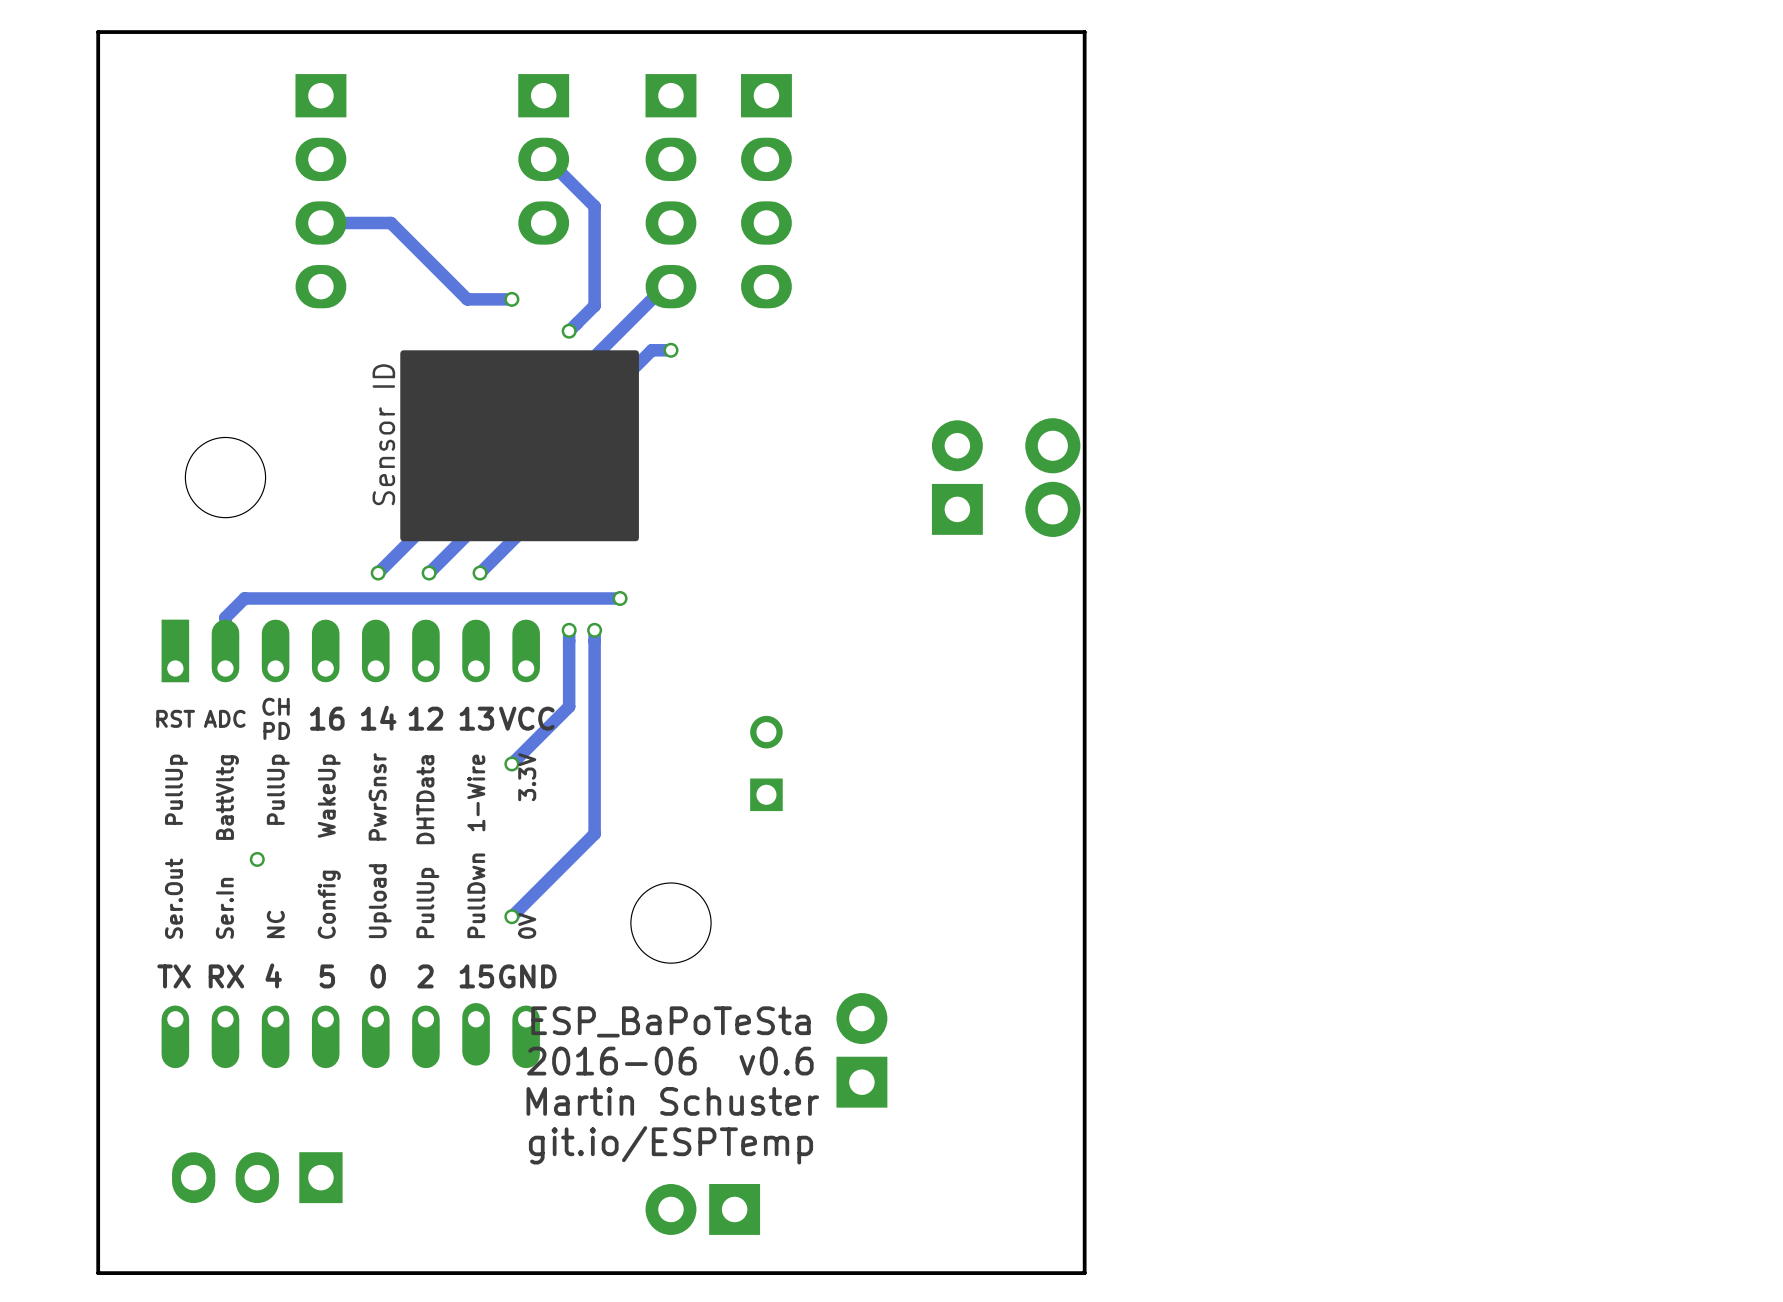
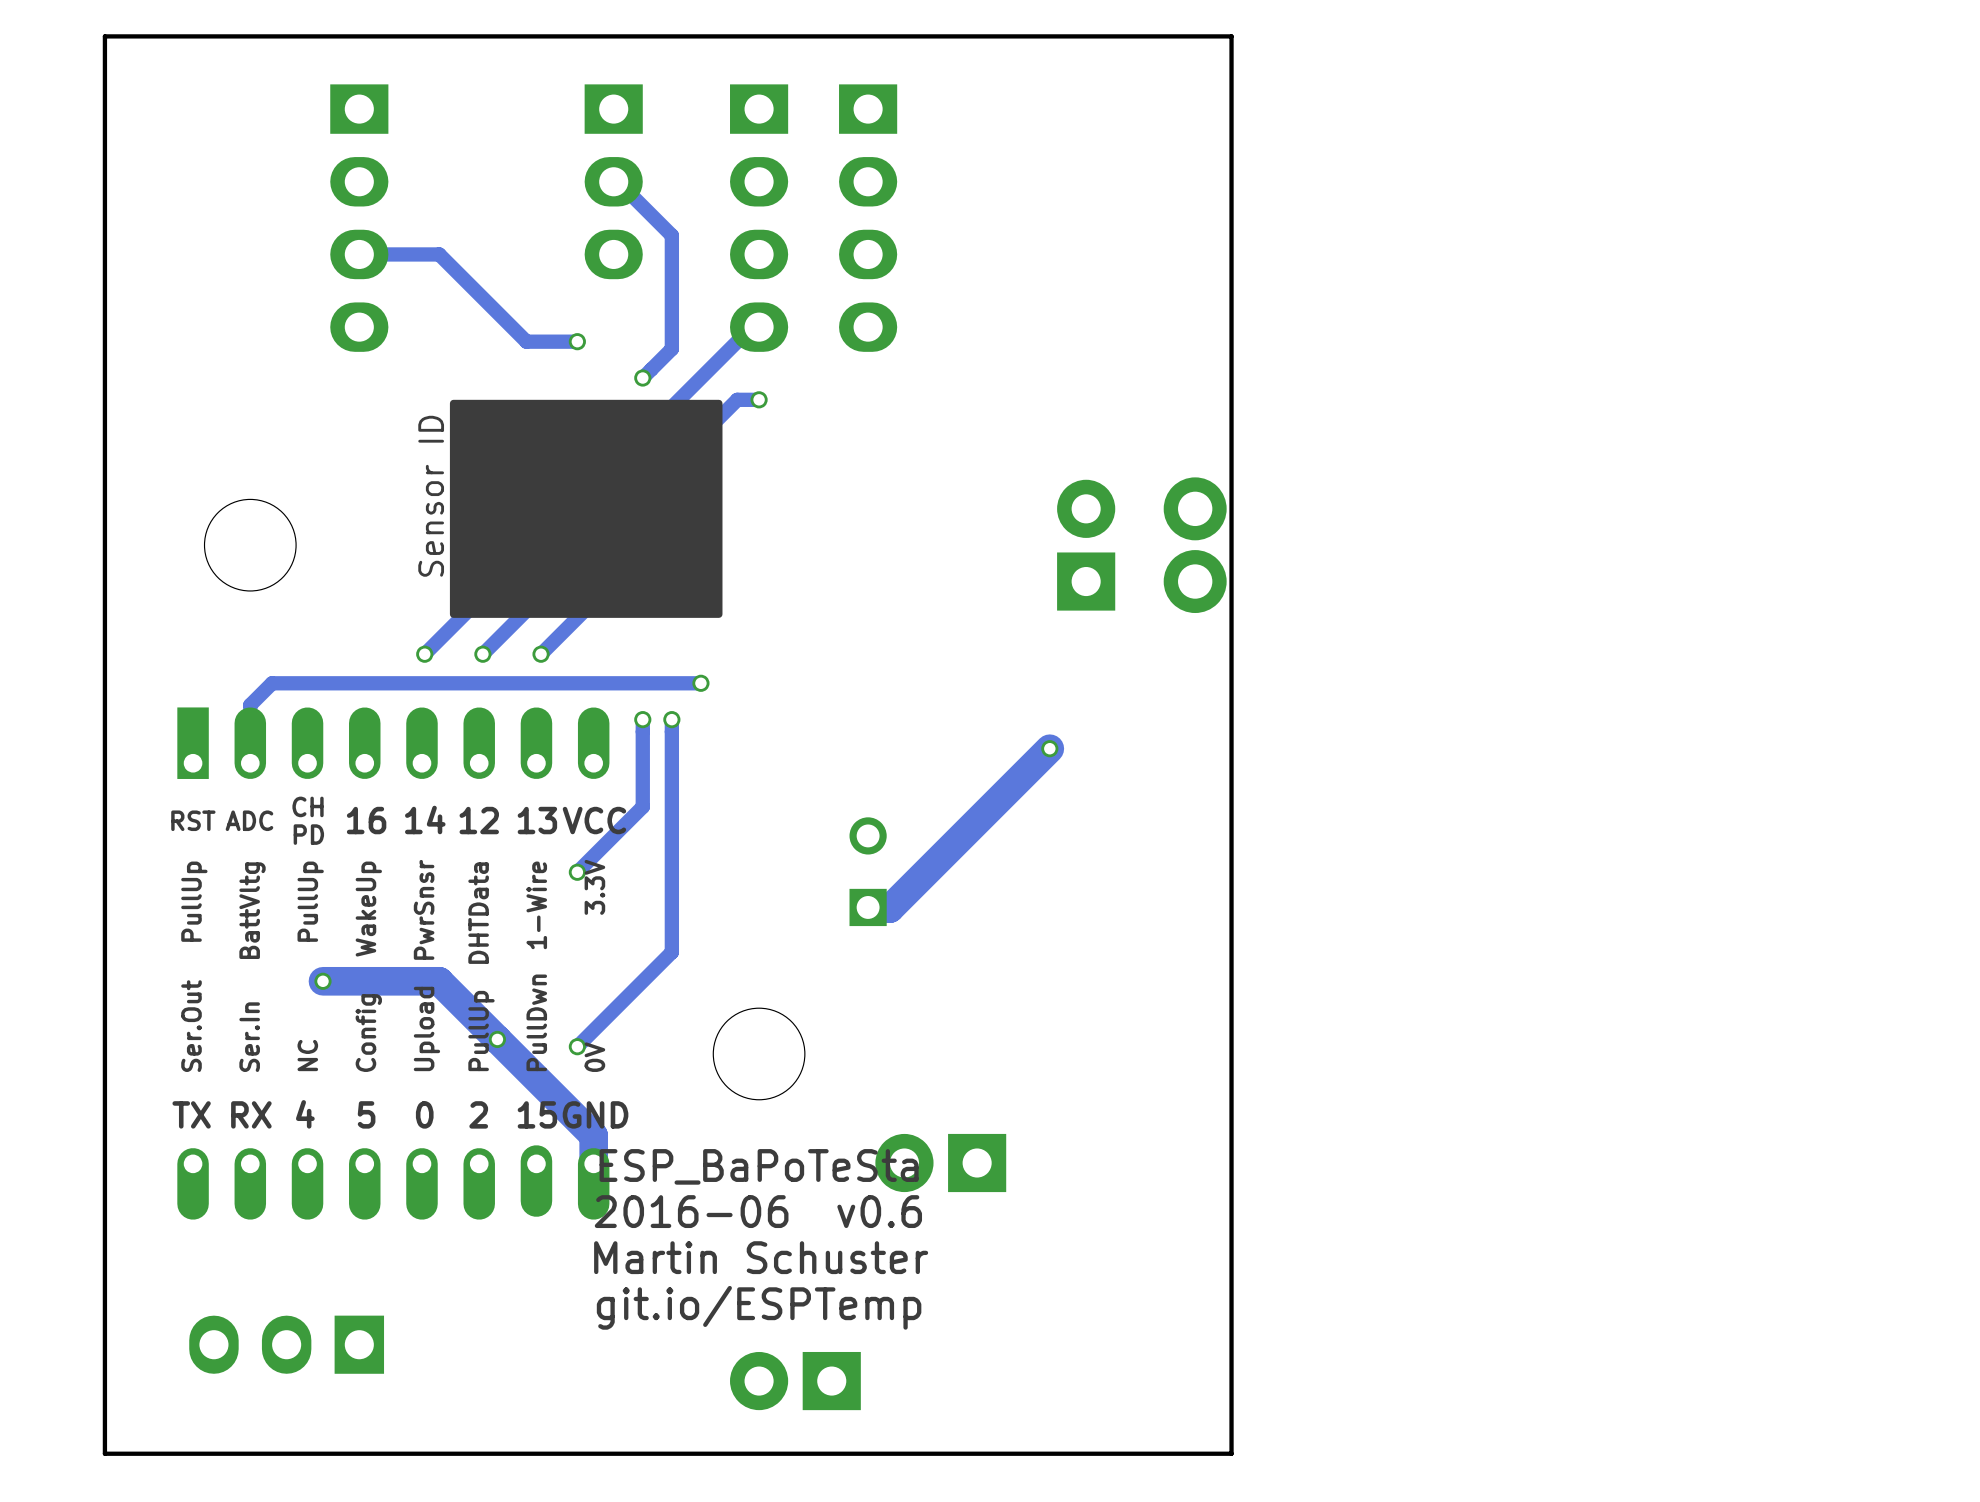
track: none -> (1049, 748) (889, 908) (868, 907)
via: none -> (1049, 748)
via position: (257, 859) -> (322, 981)
track: none -> (322, 981) (439, 981) (593, 1135) (593, 1163)
via: none -> (497, 1039)
part rotation: 0° (861, 1050) -> 90° counterclockwise (940, 1163)

